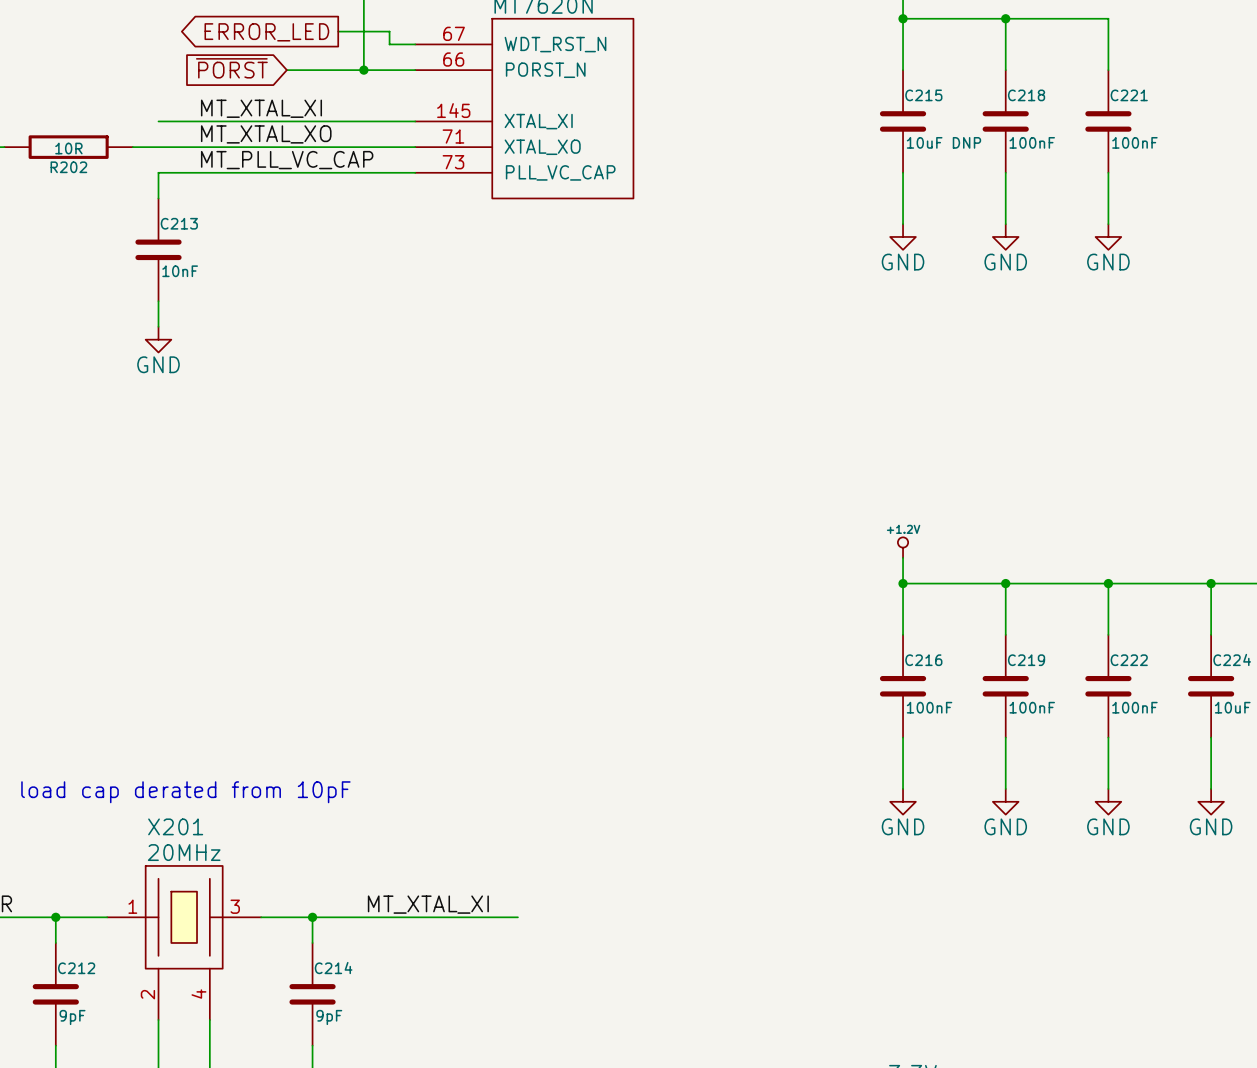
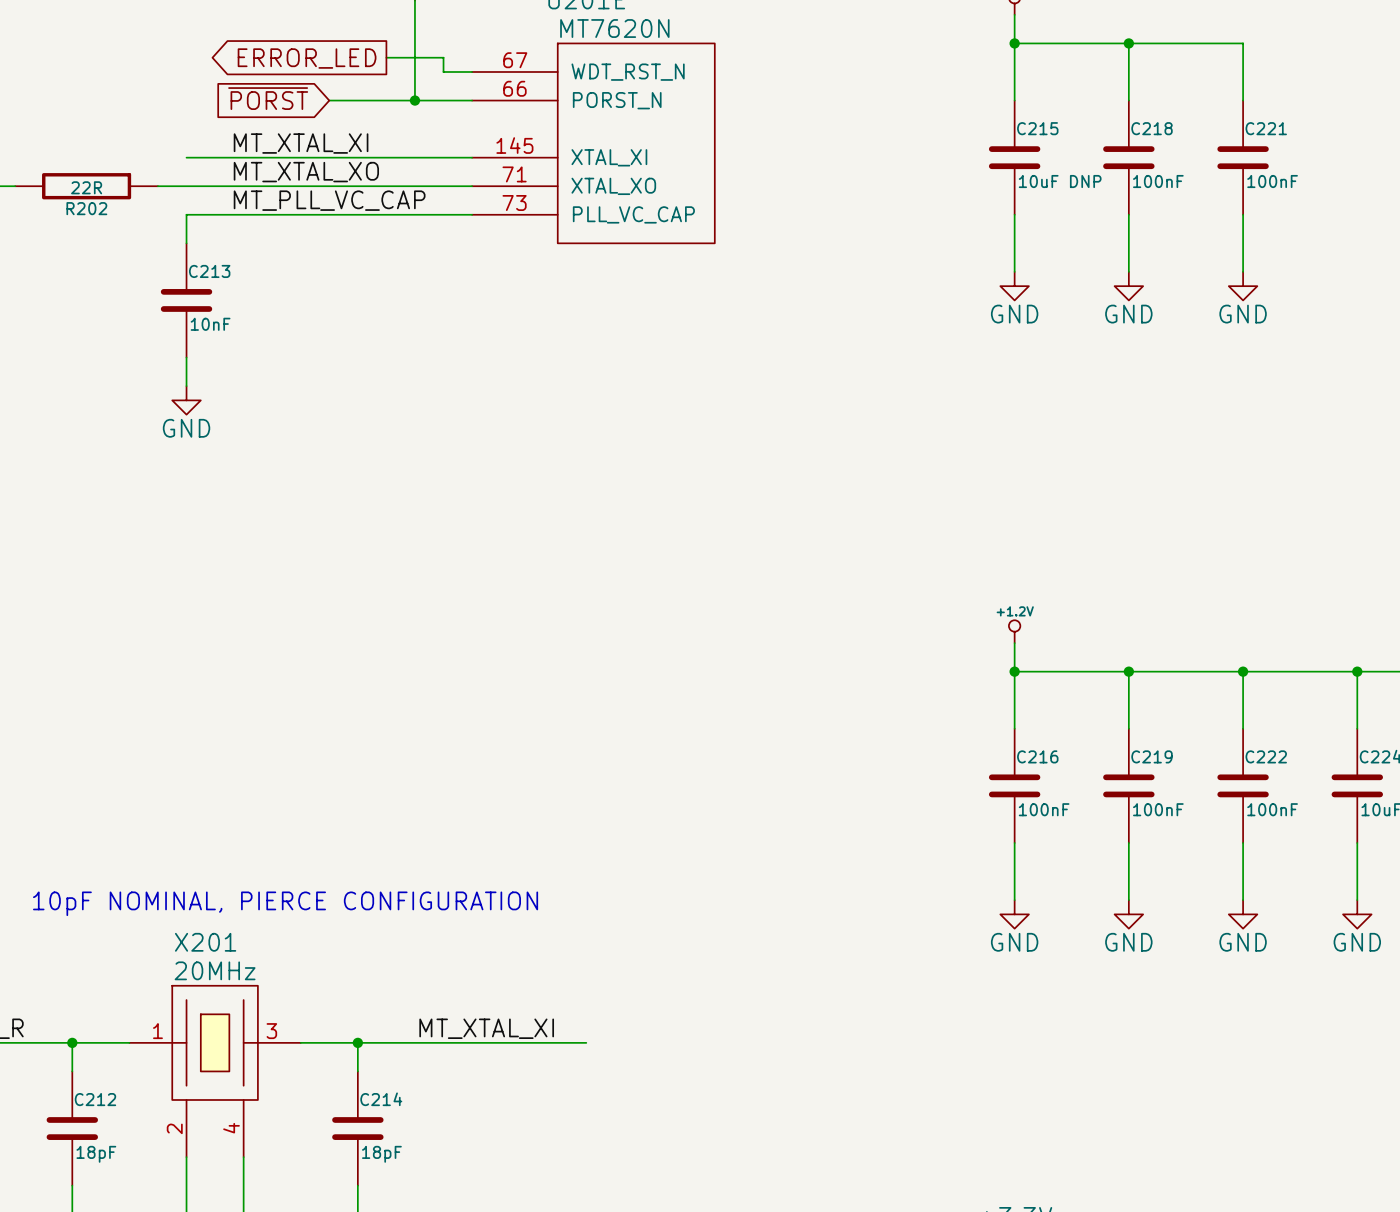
R202 value: 10R (68, 148) -> 22R (86, 187)
text: load cap derated from 10pF (185, 792) -> 10pF NOMINAL, PIERCE CONFIGURATION (285, 903)
C212 value: 9pF (72, 1017) -> 18pF (96, 1154)
C214 value: 9pF (329, 1017) -> 18pF (381, 1154)

